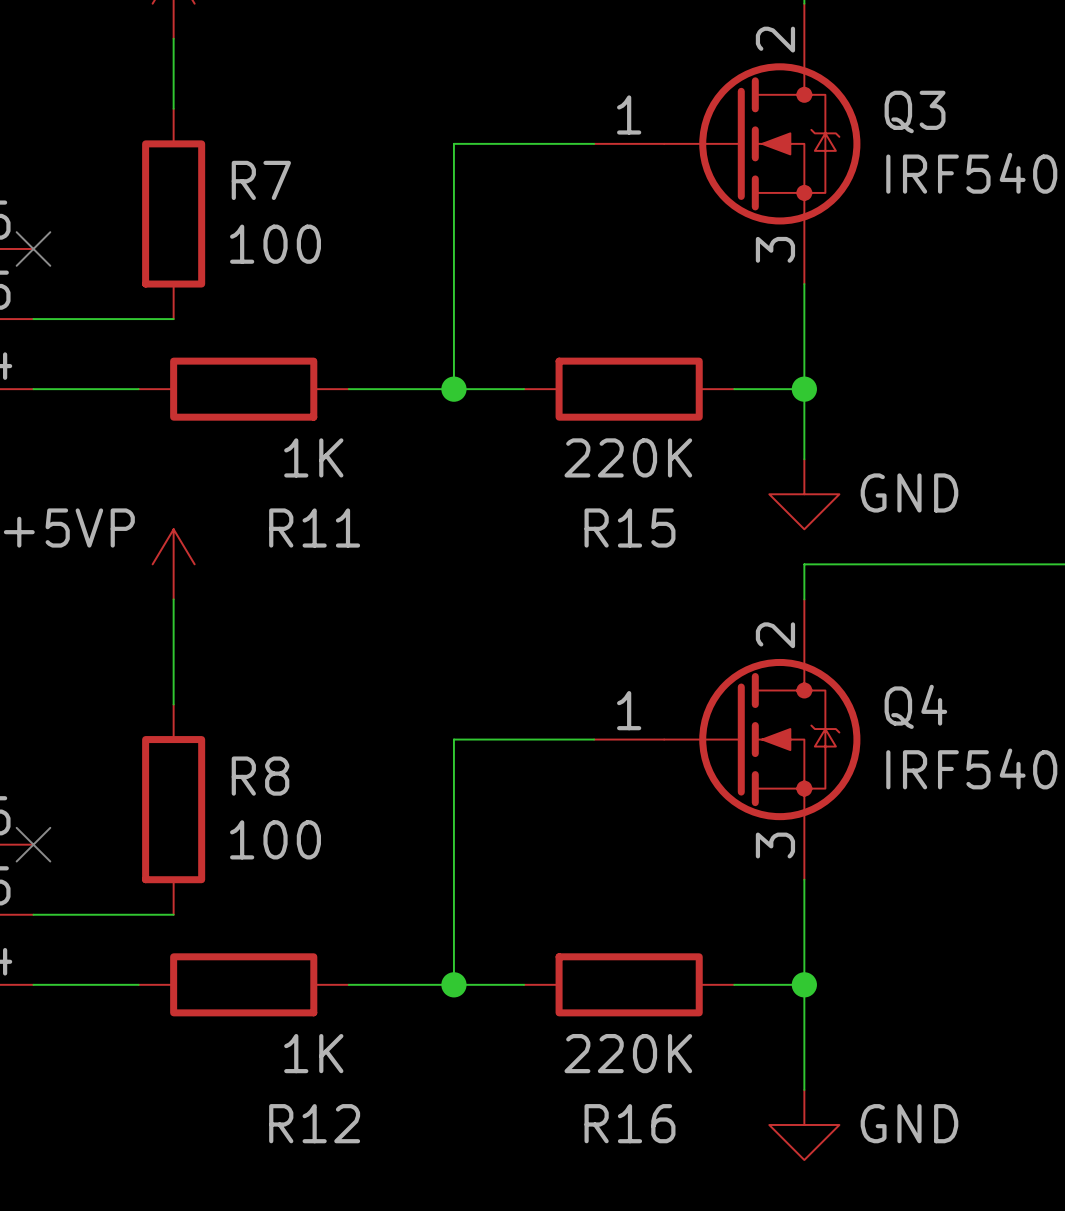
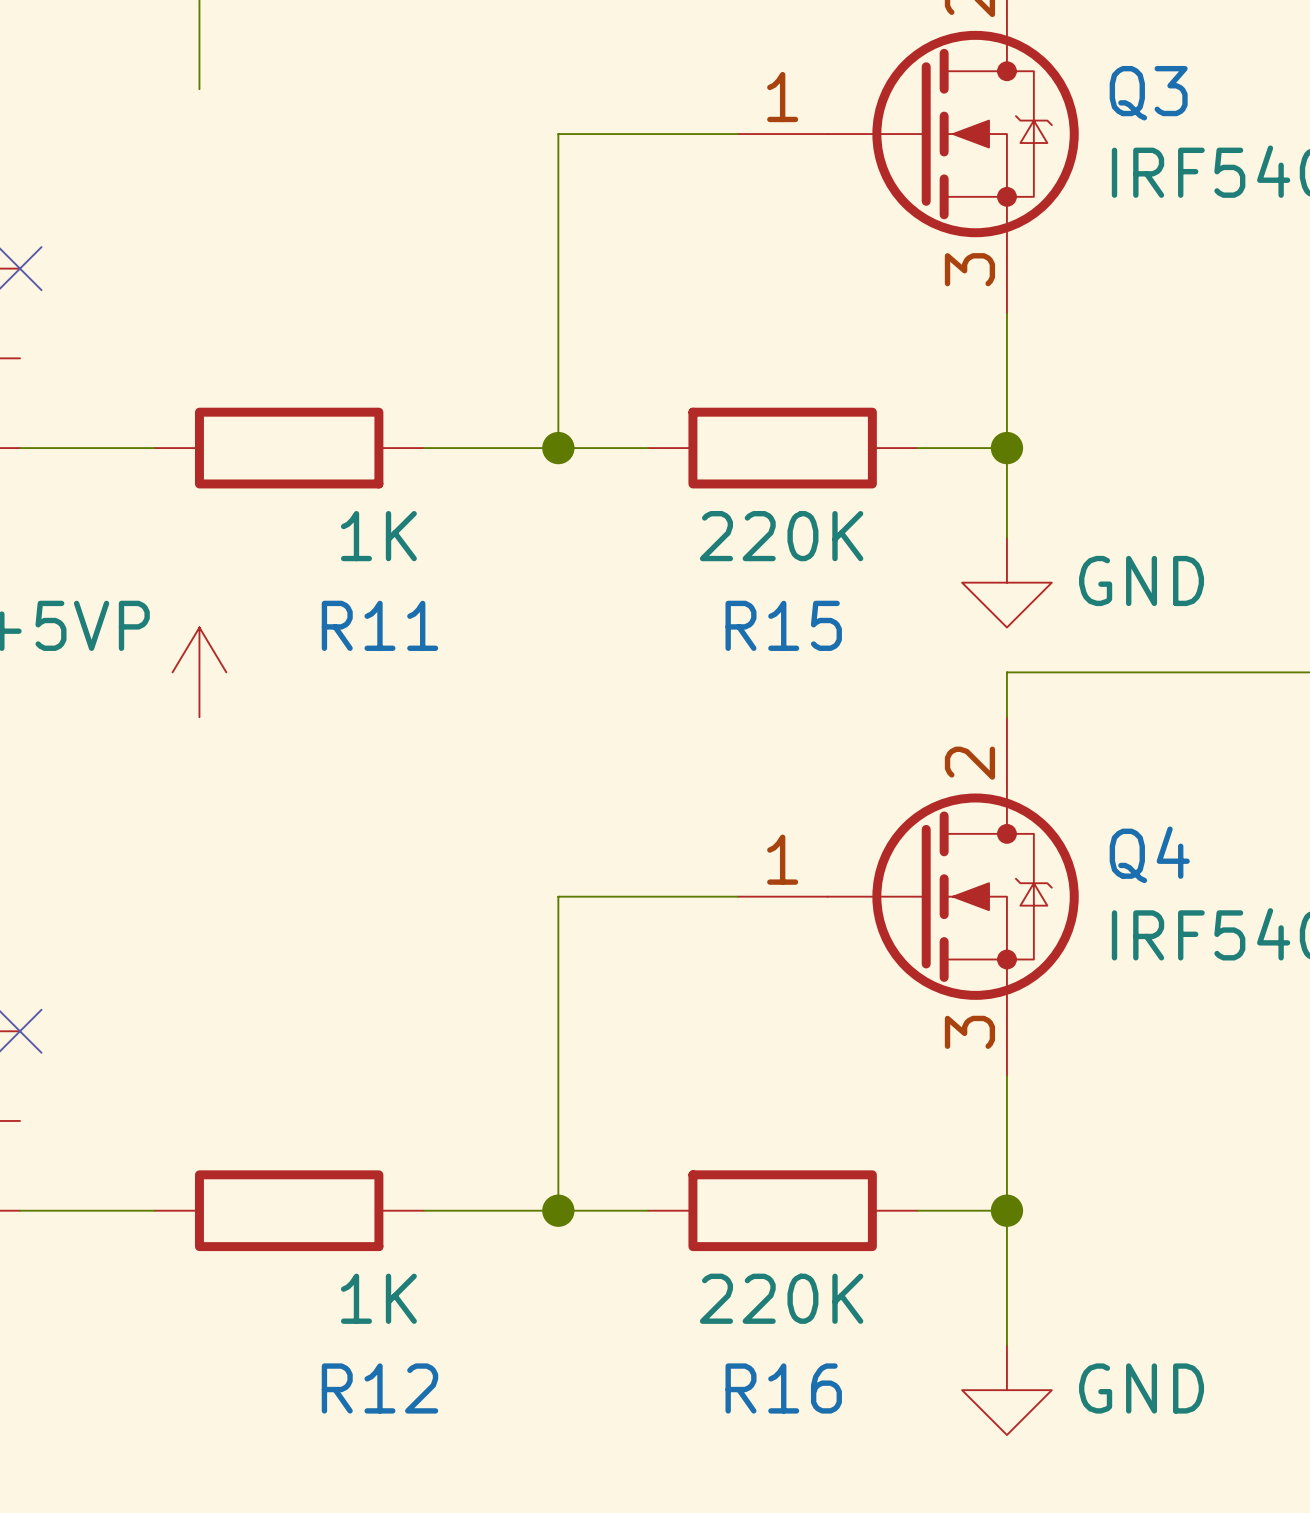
R7: 100 (173, 213) -> none
wire: (33, 319) (173, 319) -> none
wire: (173, 599) (173, 704) -> none
R8: 100 (173, 809) -> none
wire: (33, 914) (173, 914) -> none

